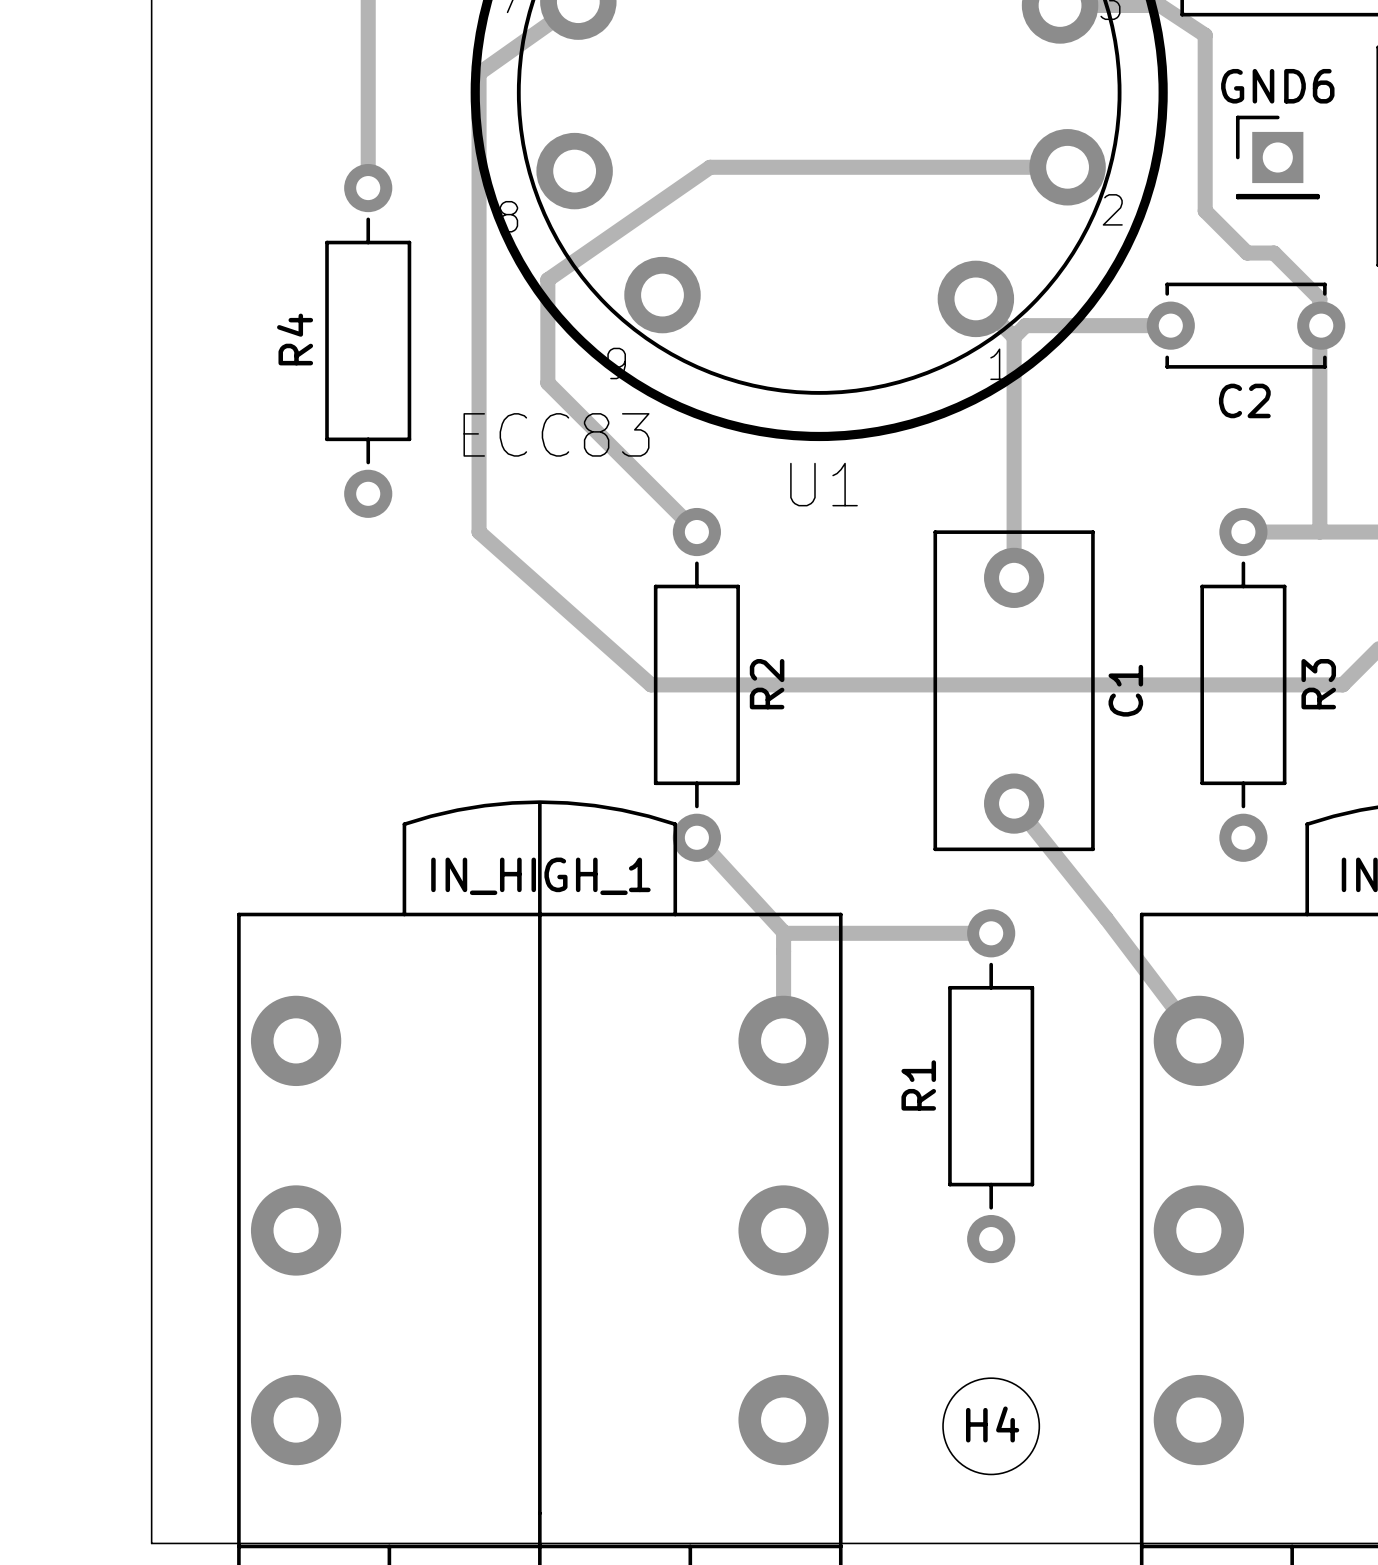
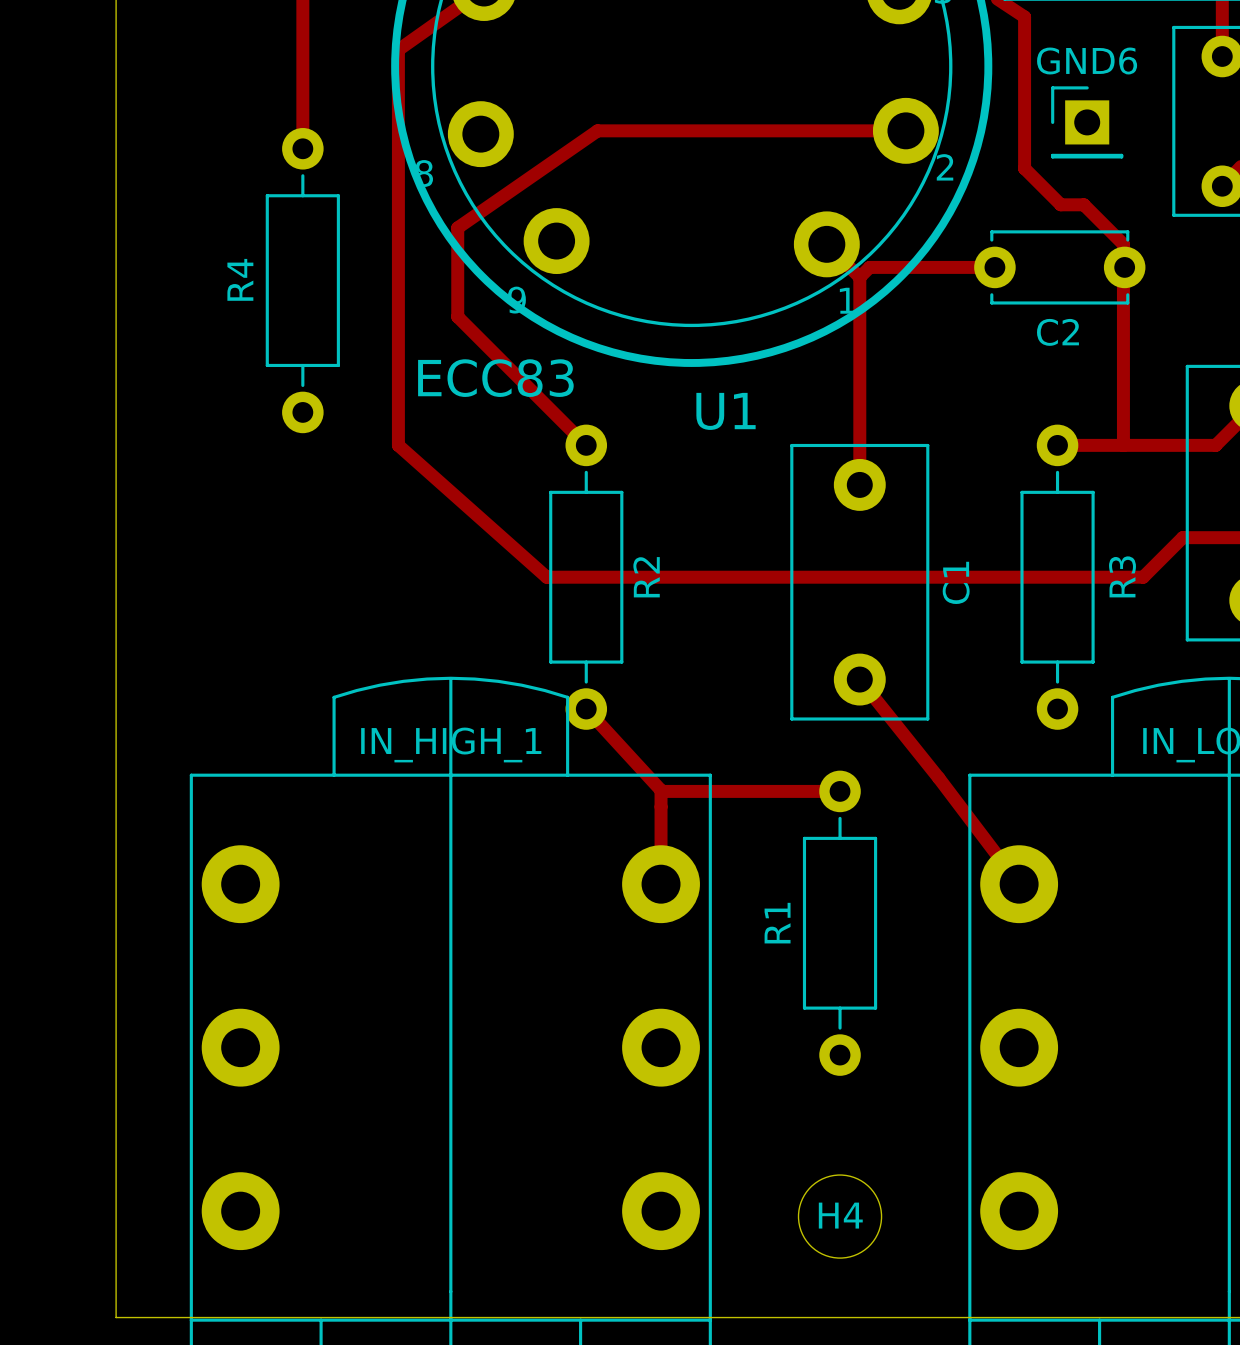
U1 value position: ECC83 (556, 434) -> ECC83 (495, 378)
U1 name position: U1 (824, 484) -> U1 (726, 411)

